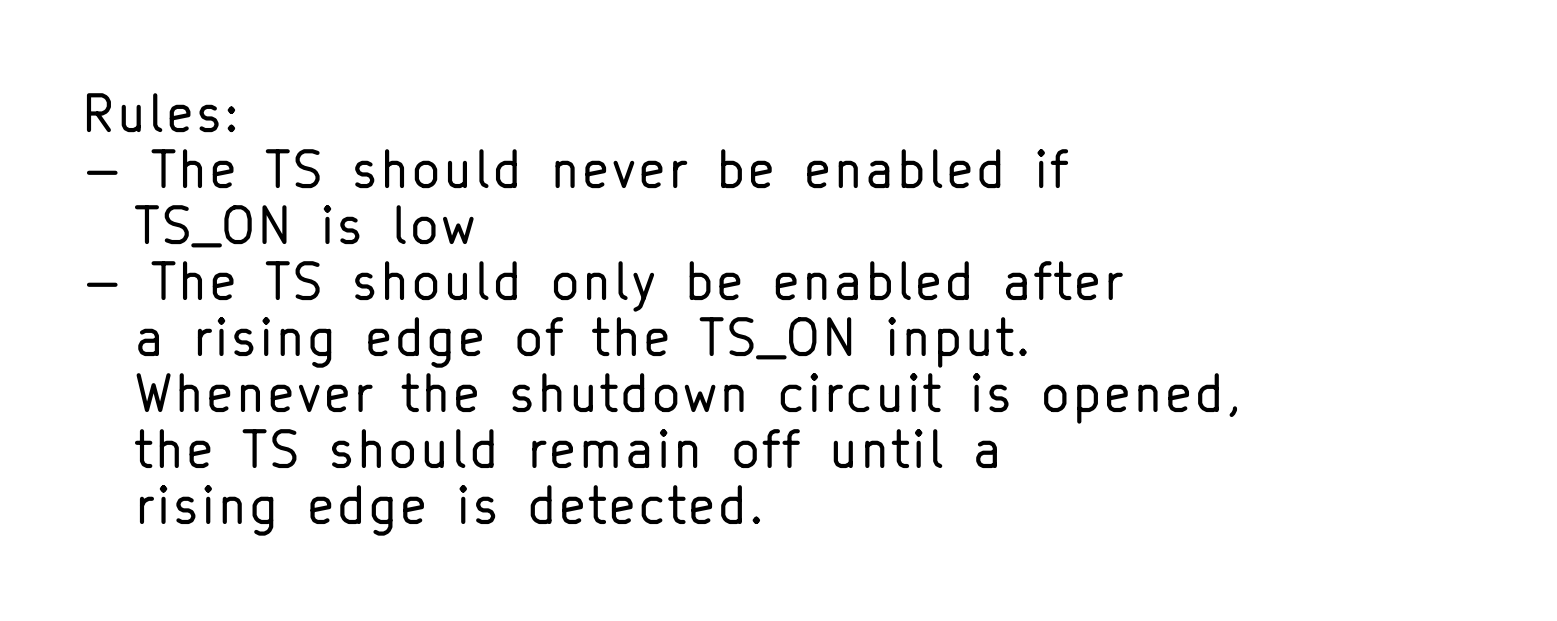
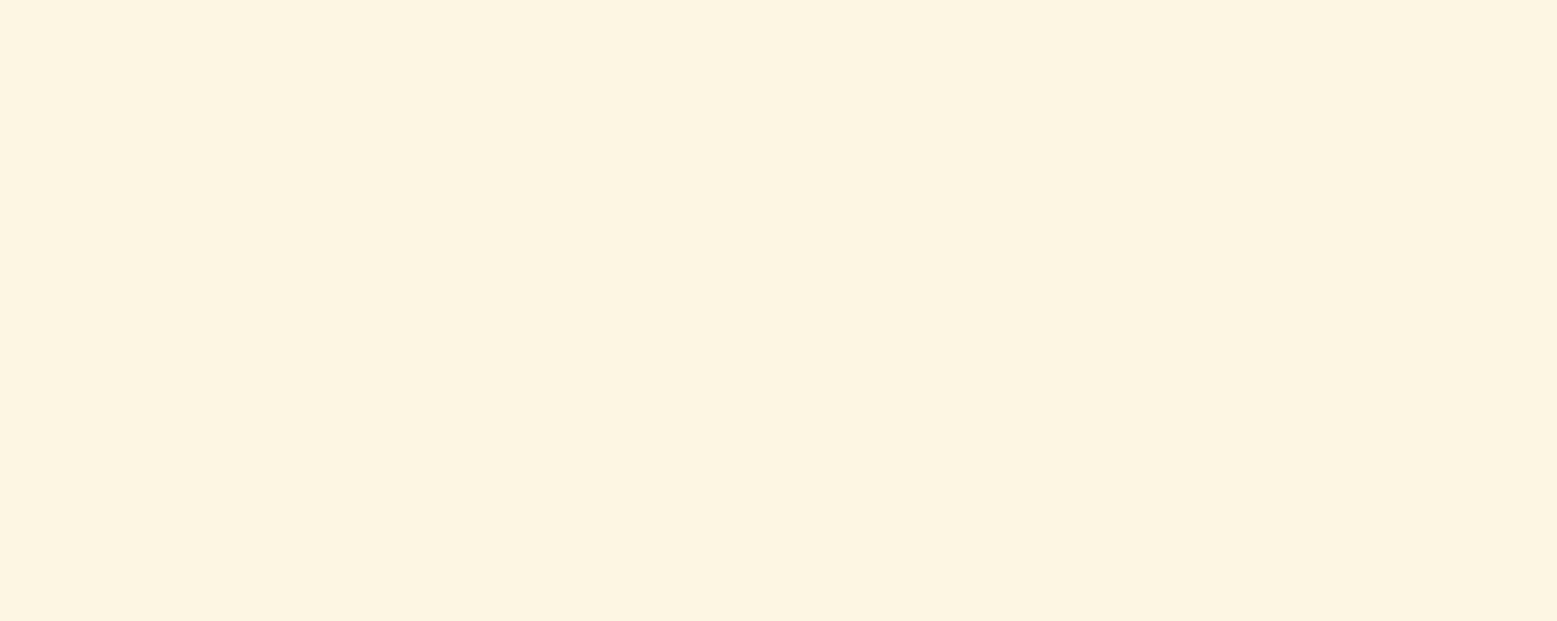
text: Rules: (161, 112) -> none
text: - The TS should never be enabled if (577, 168) -> none
text: TS_ON is low (304, 226) -> none
text: - The TS should only be enabled after (604, 286) -> none
text: a rising edge of the TS_ON input. (582, 342) -> none
text: Whenever the shutdown circuit is opened, (686, 398) -> none
text: the TS should remain off until a (565, 448) -> none
text: rising edge is detected. (450, 510) -> none

